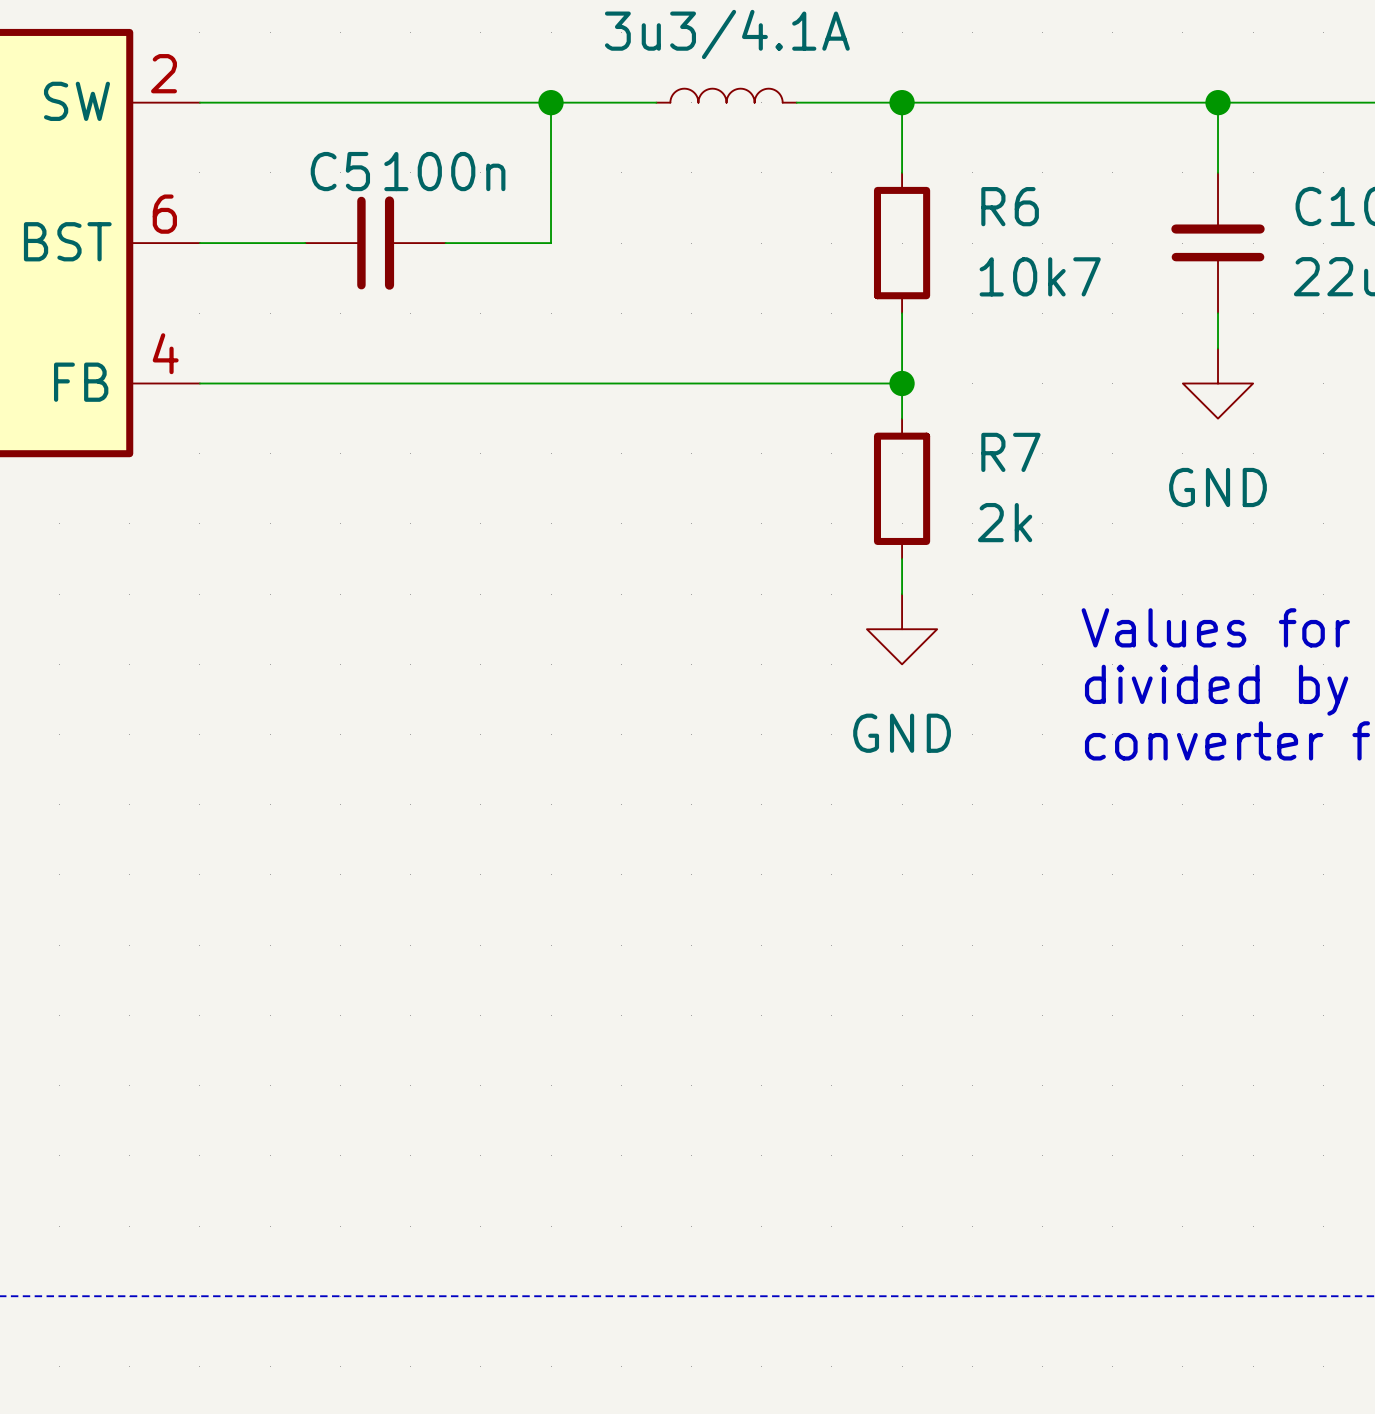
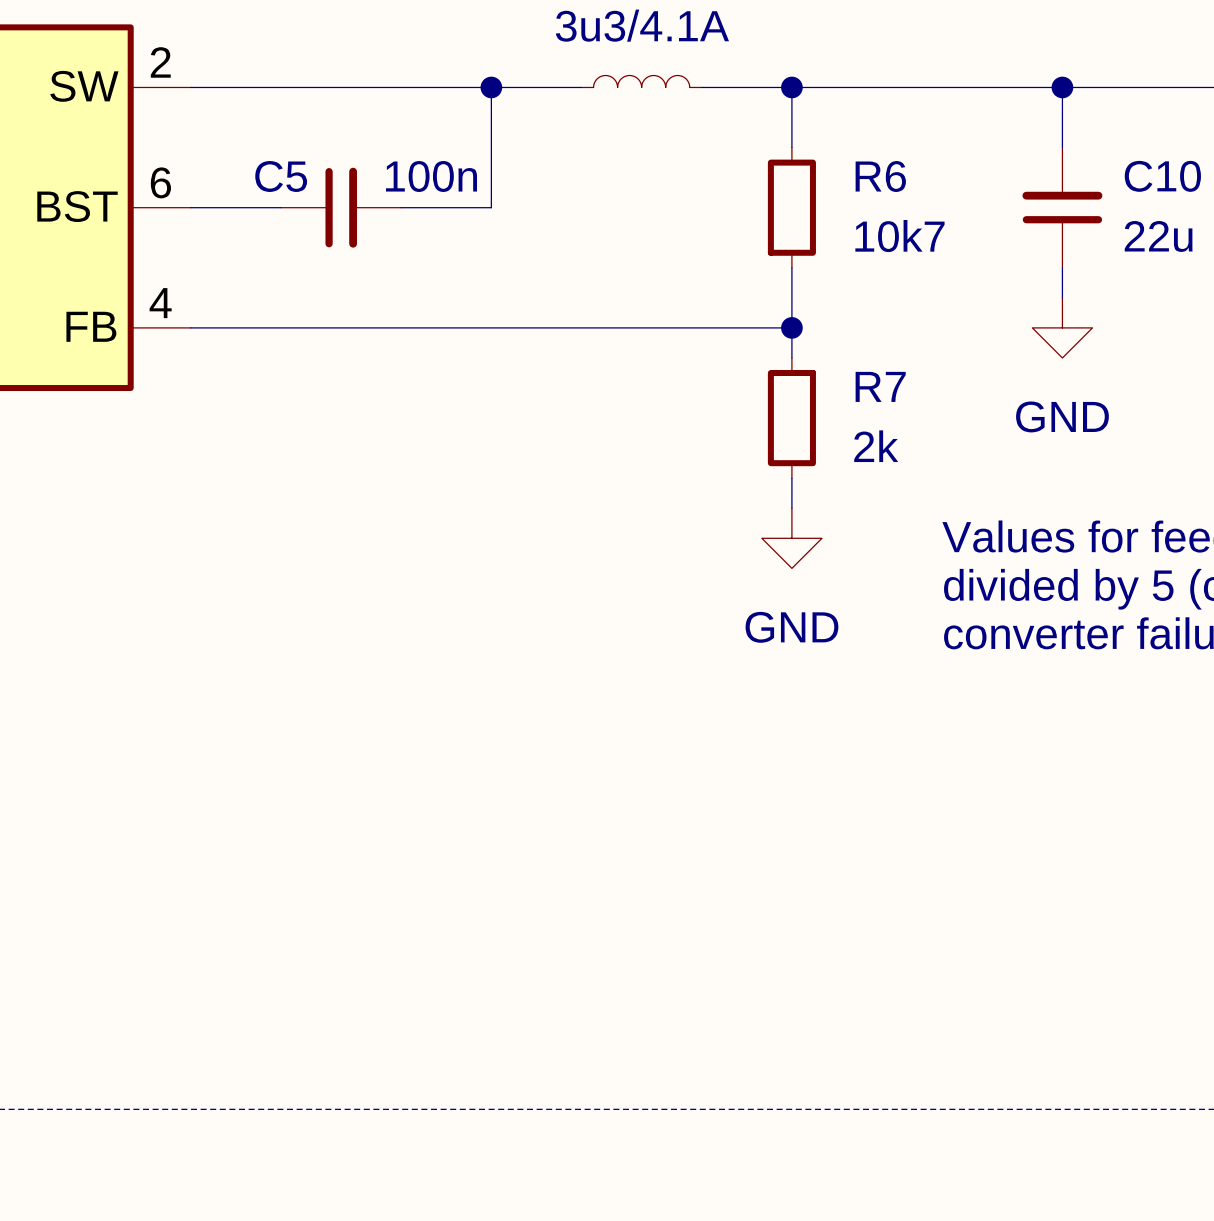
C5 name position: C5 (340, 171) -> C5 (281, 176)
C5 text position: 100n (444, 171) -> 100n (431, 176)

